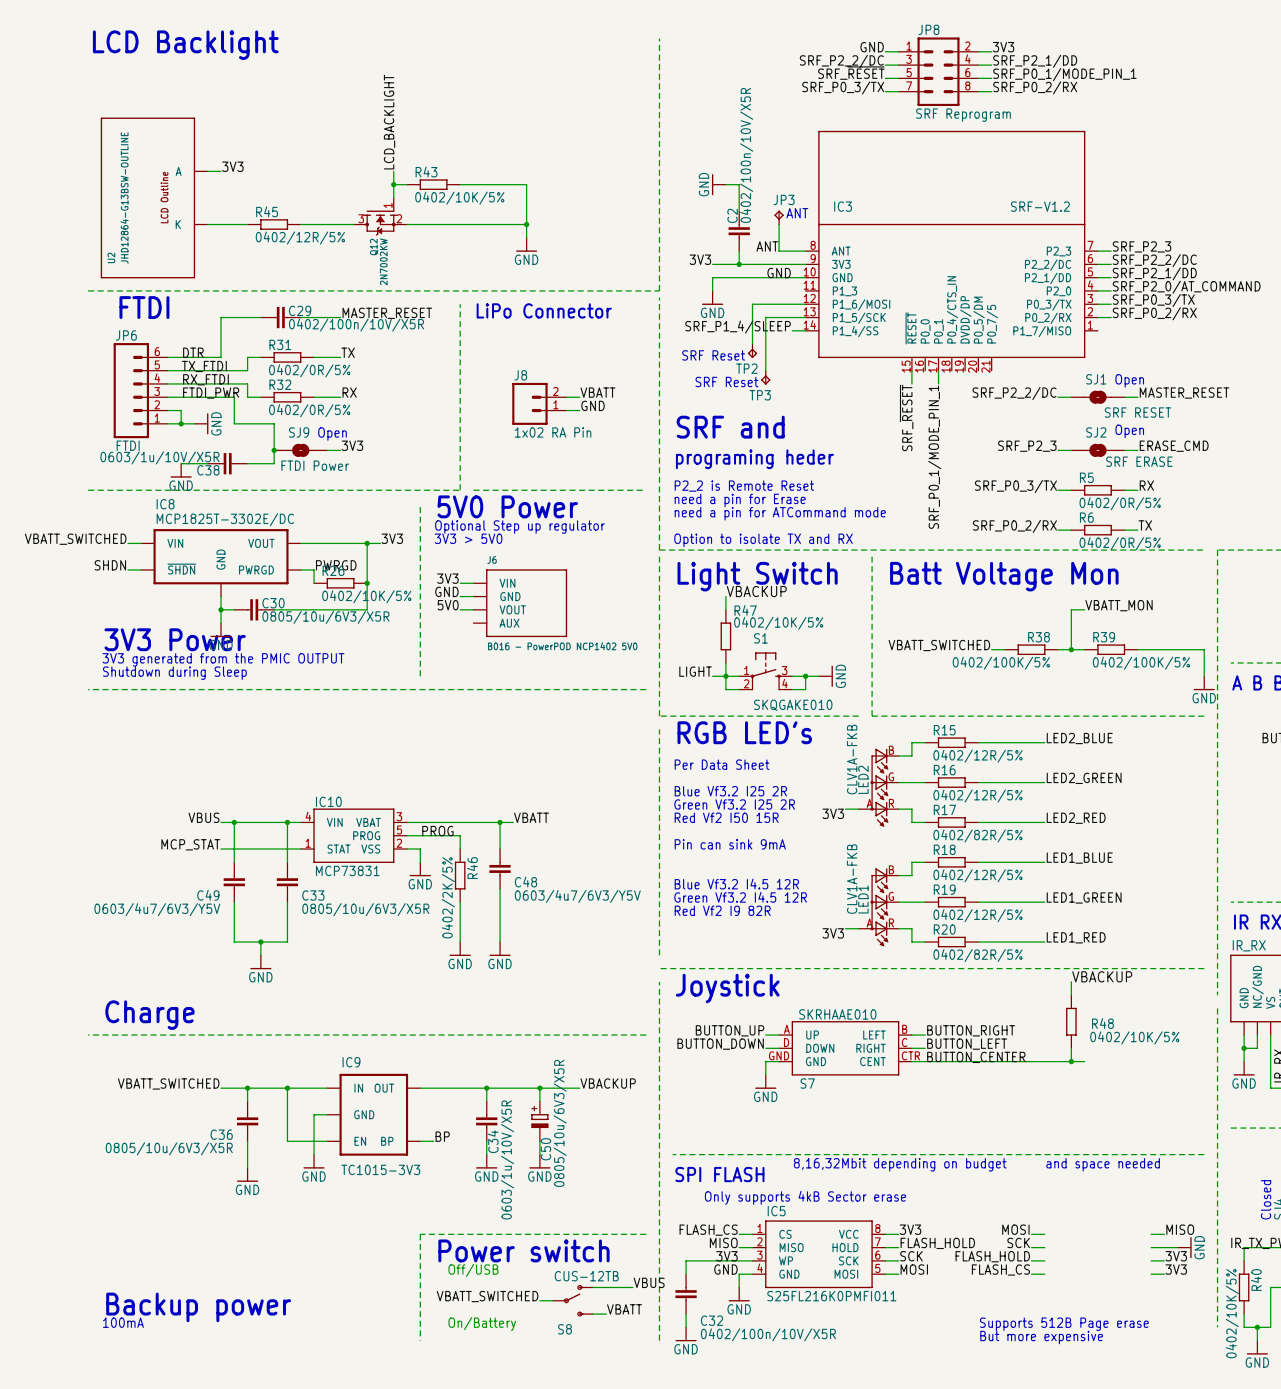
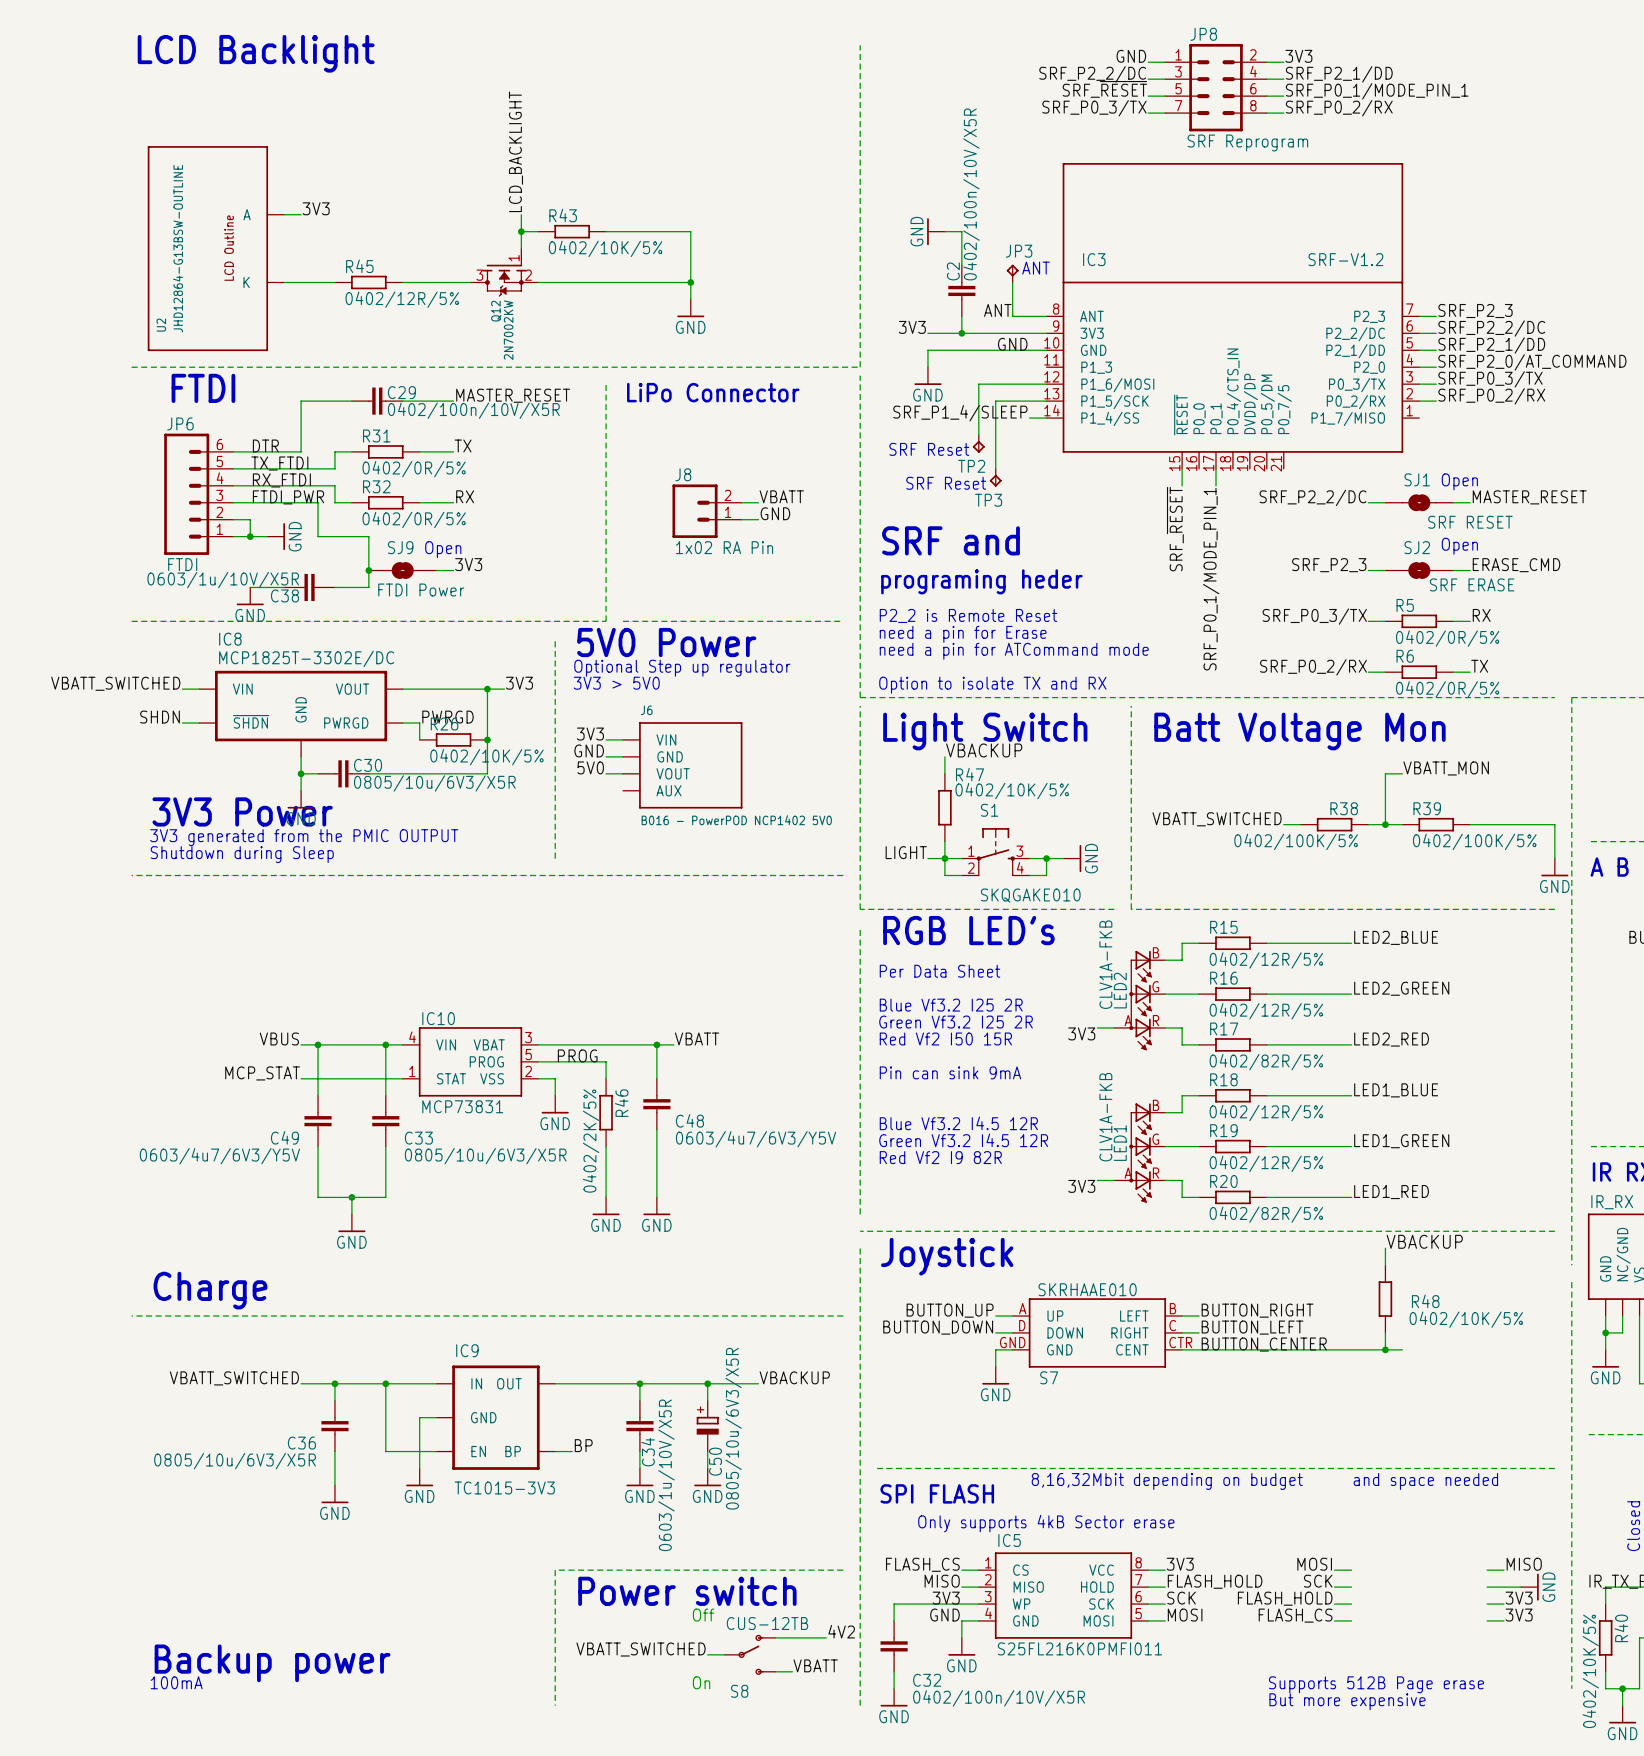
text: none -> Off (703, 1615)
text: Off/USB (473, 1270) -> none
label: VBUS (649, 1282) -> 4V2 (841, 1631)
text: none -> On (701, 1682)
text: On/Battery (482, 1324) -> none

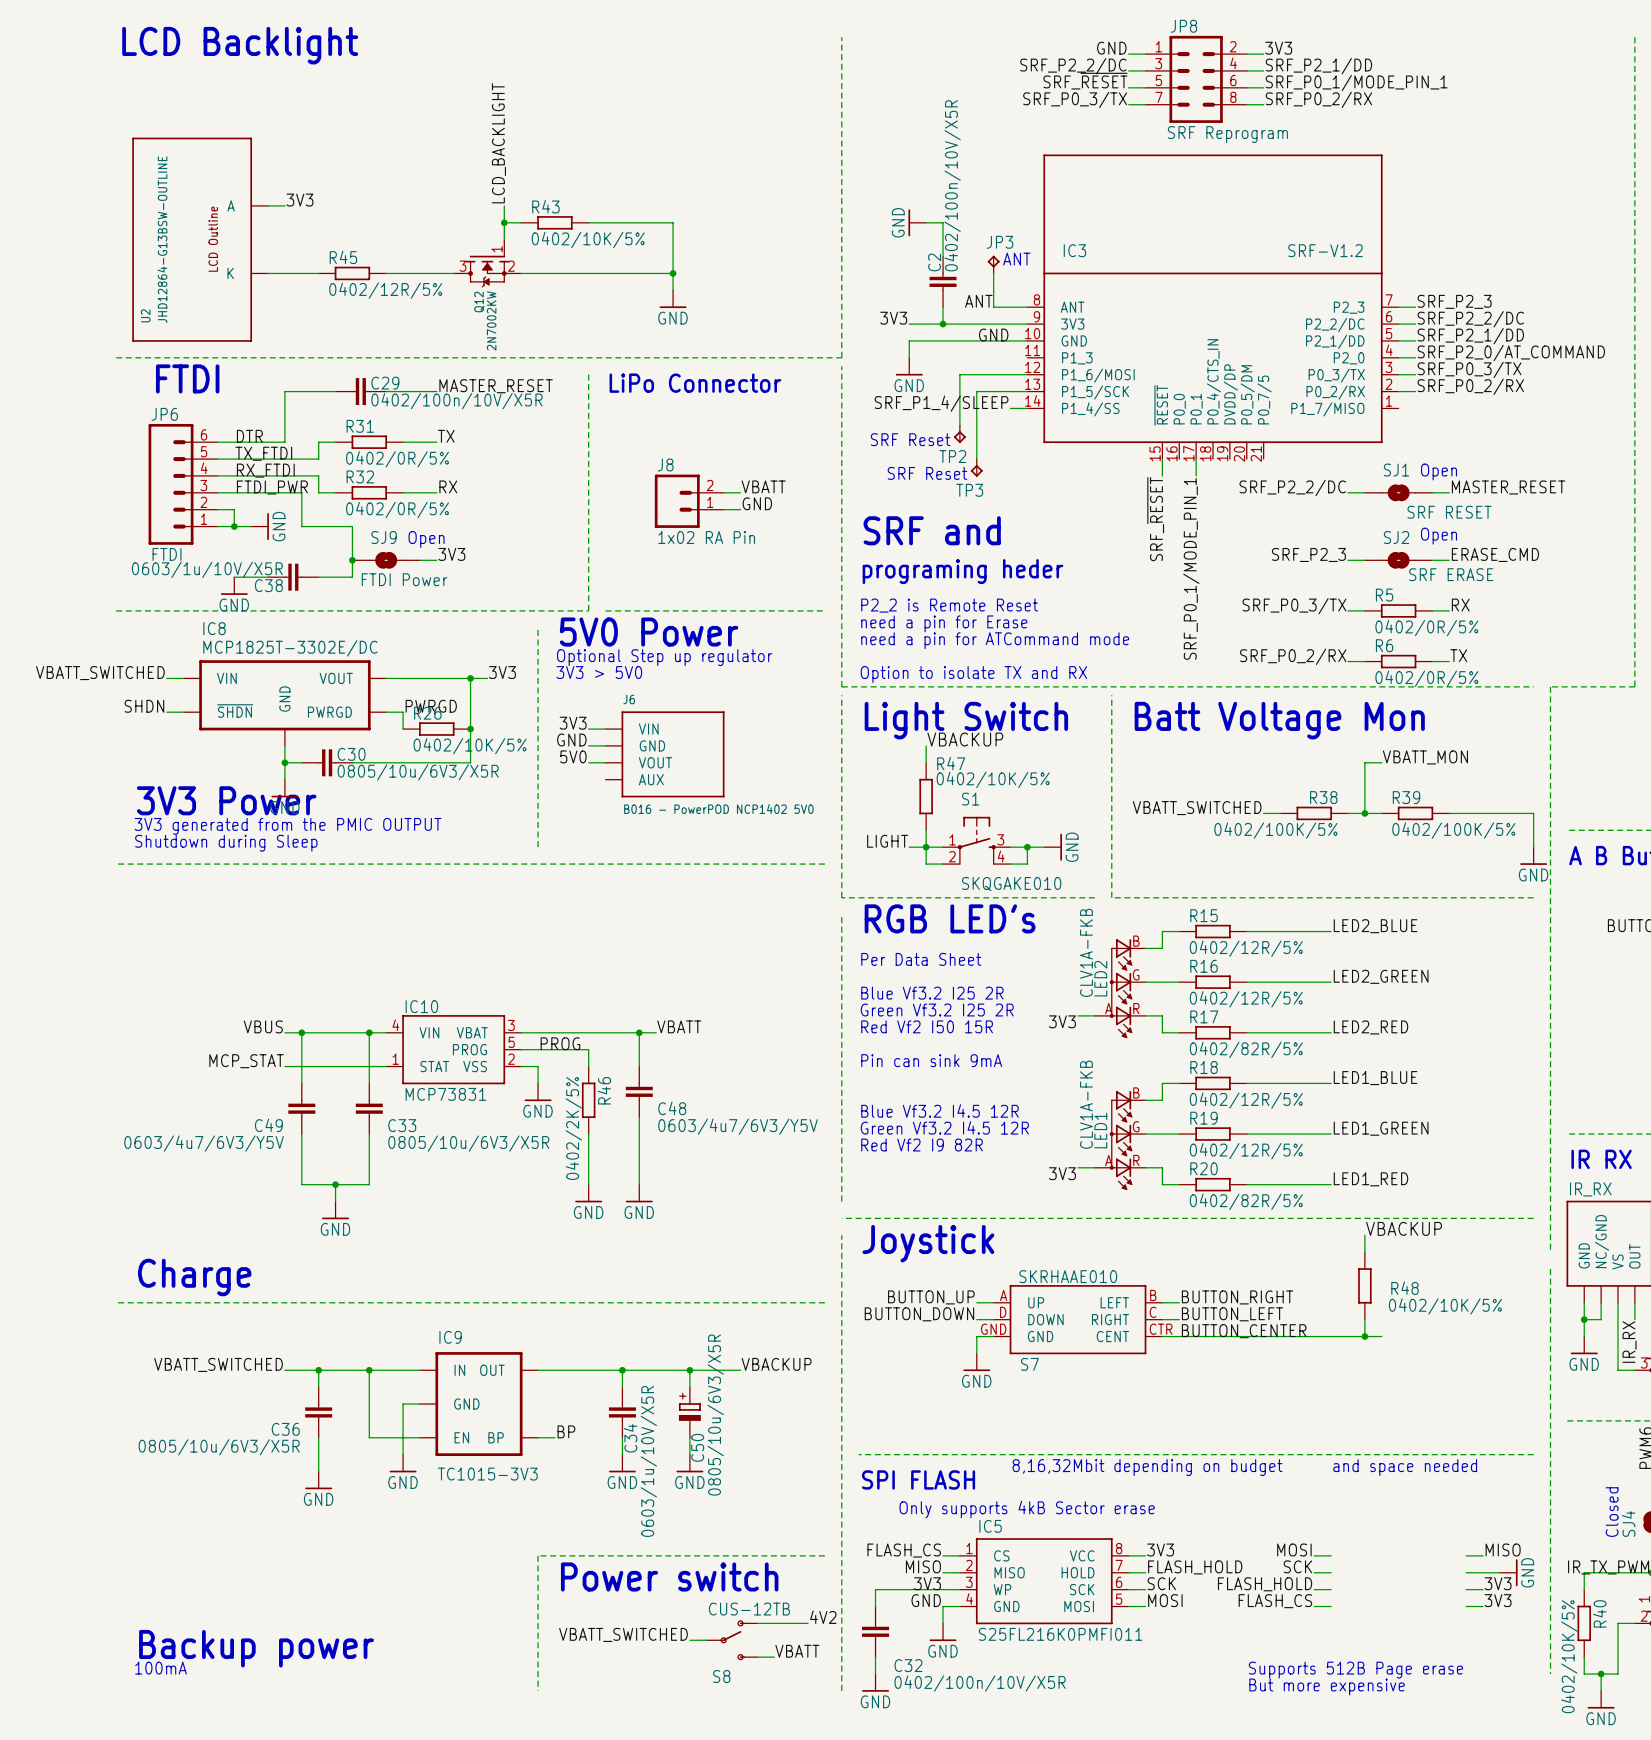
text: Off (703, 1615) -> none
text: On (701, 1682) -> none

